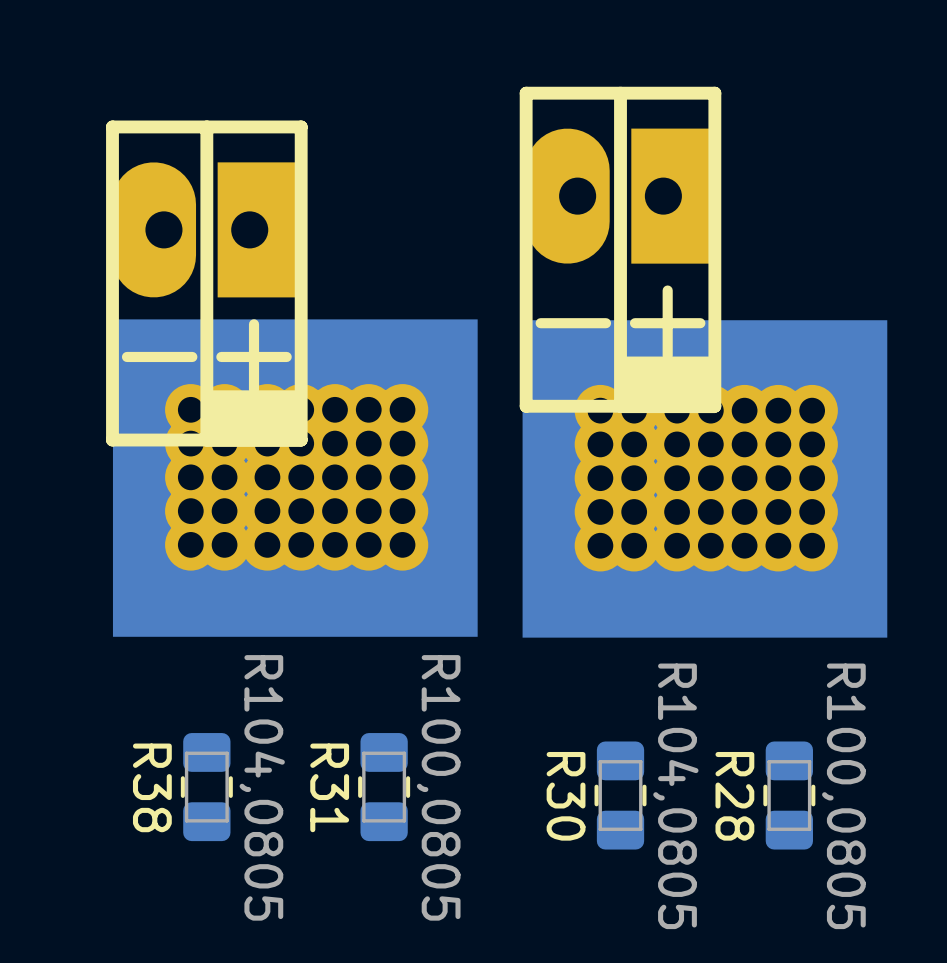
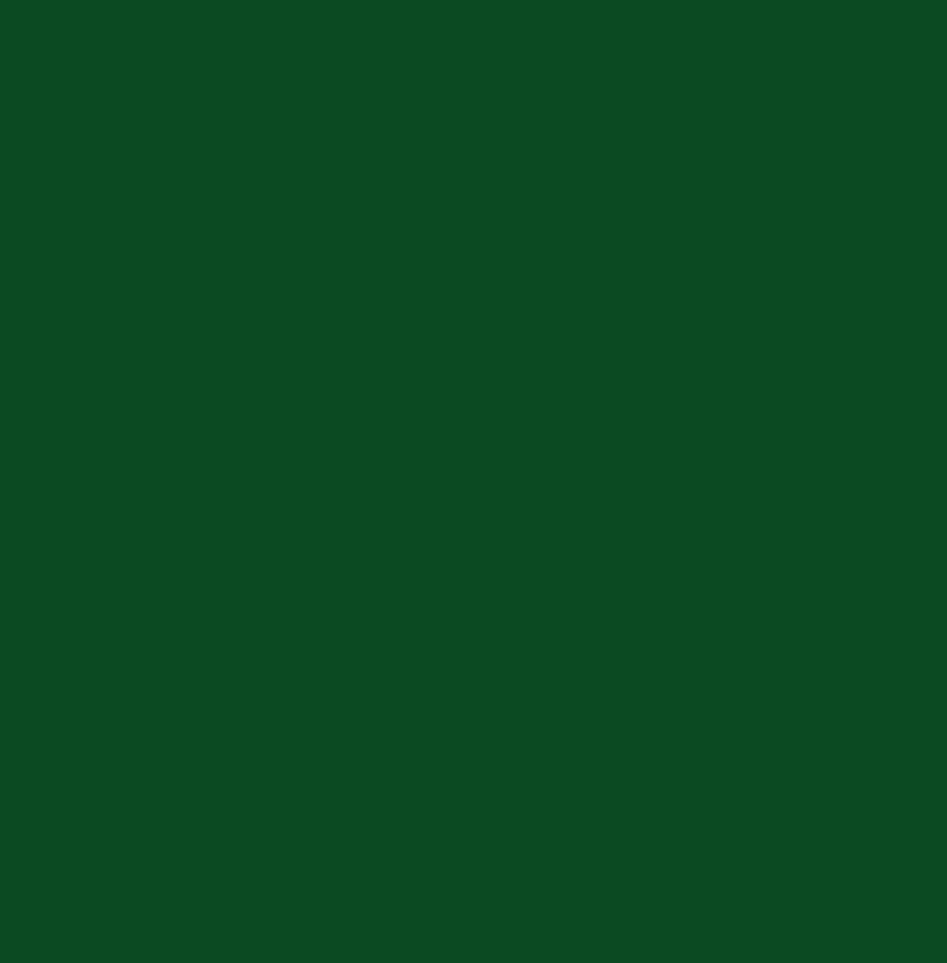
part: (620, 249) -> none
part: (206, 283) -> none
part: (295, 478) -> none
part: (704, 478) -> none
R38: R104,0805 (206, 787) -> none
R31: R100,0805 (384, 787) -> none
R30: R104,0805 (620, 795) -> none
R28: R100,0805 (789, 795) -> none

